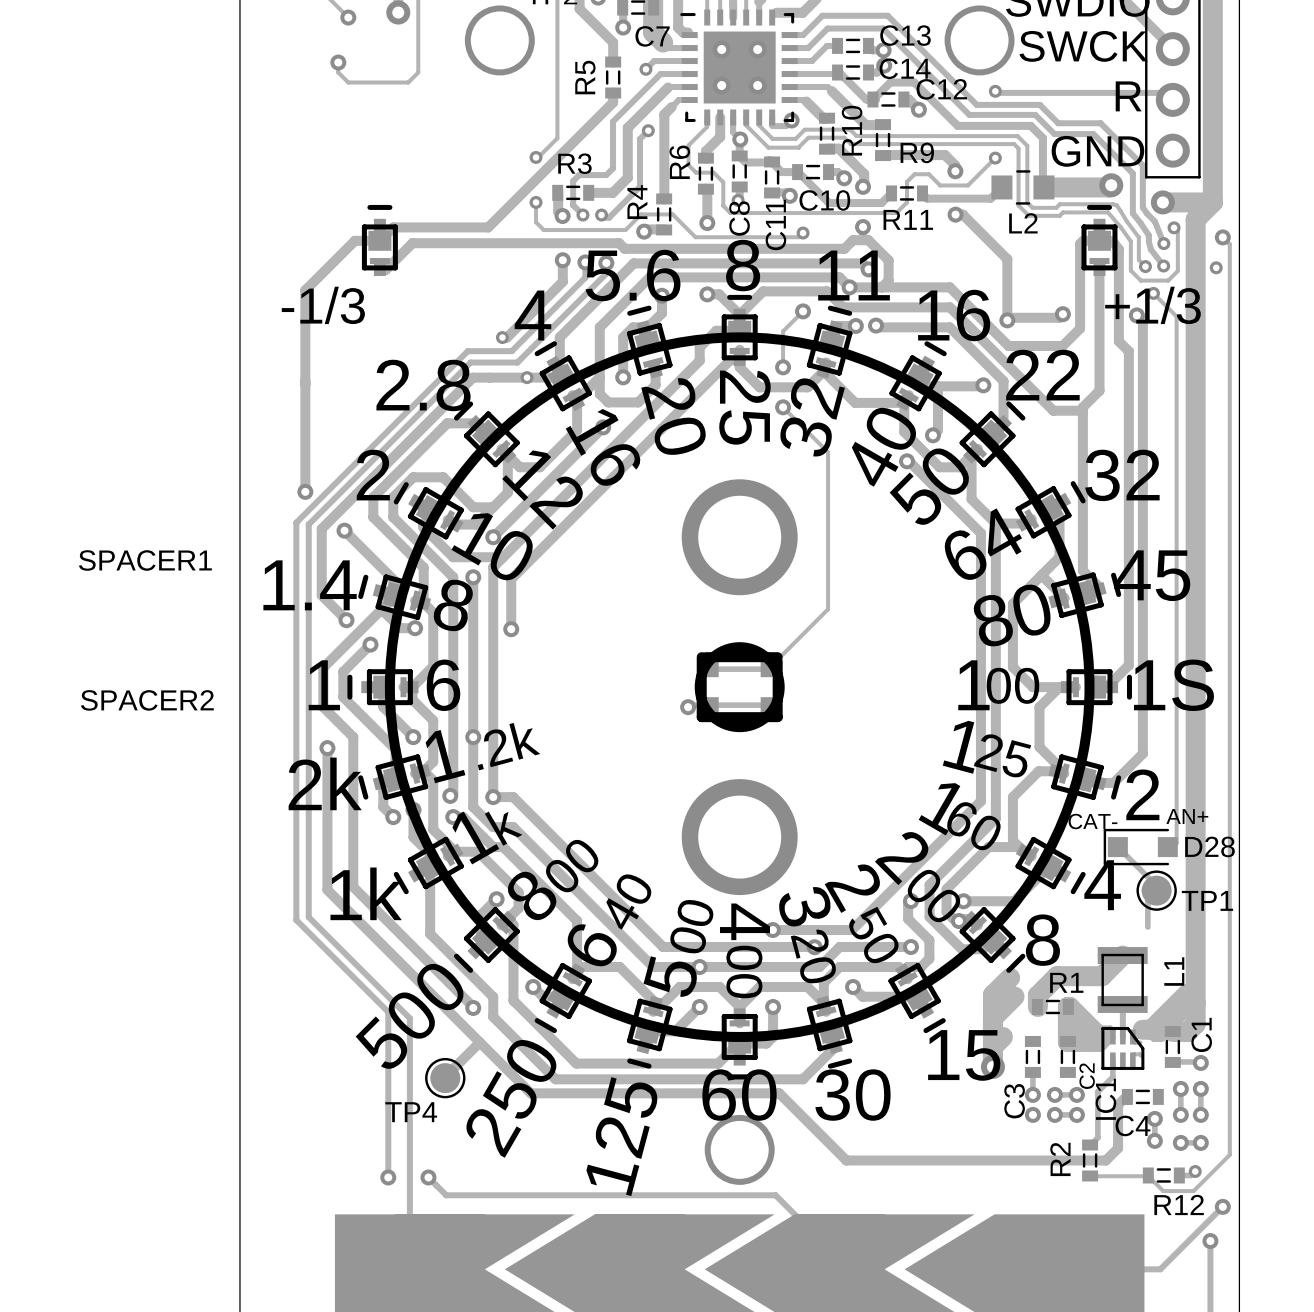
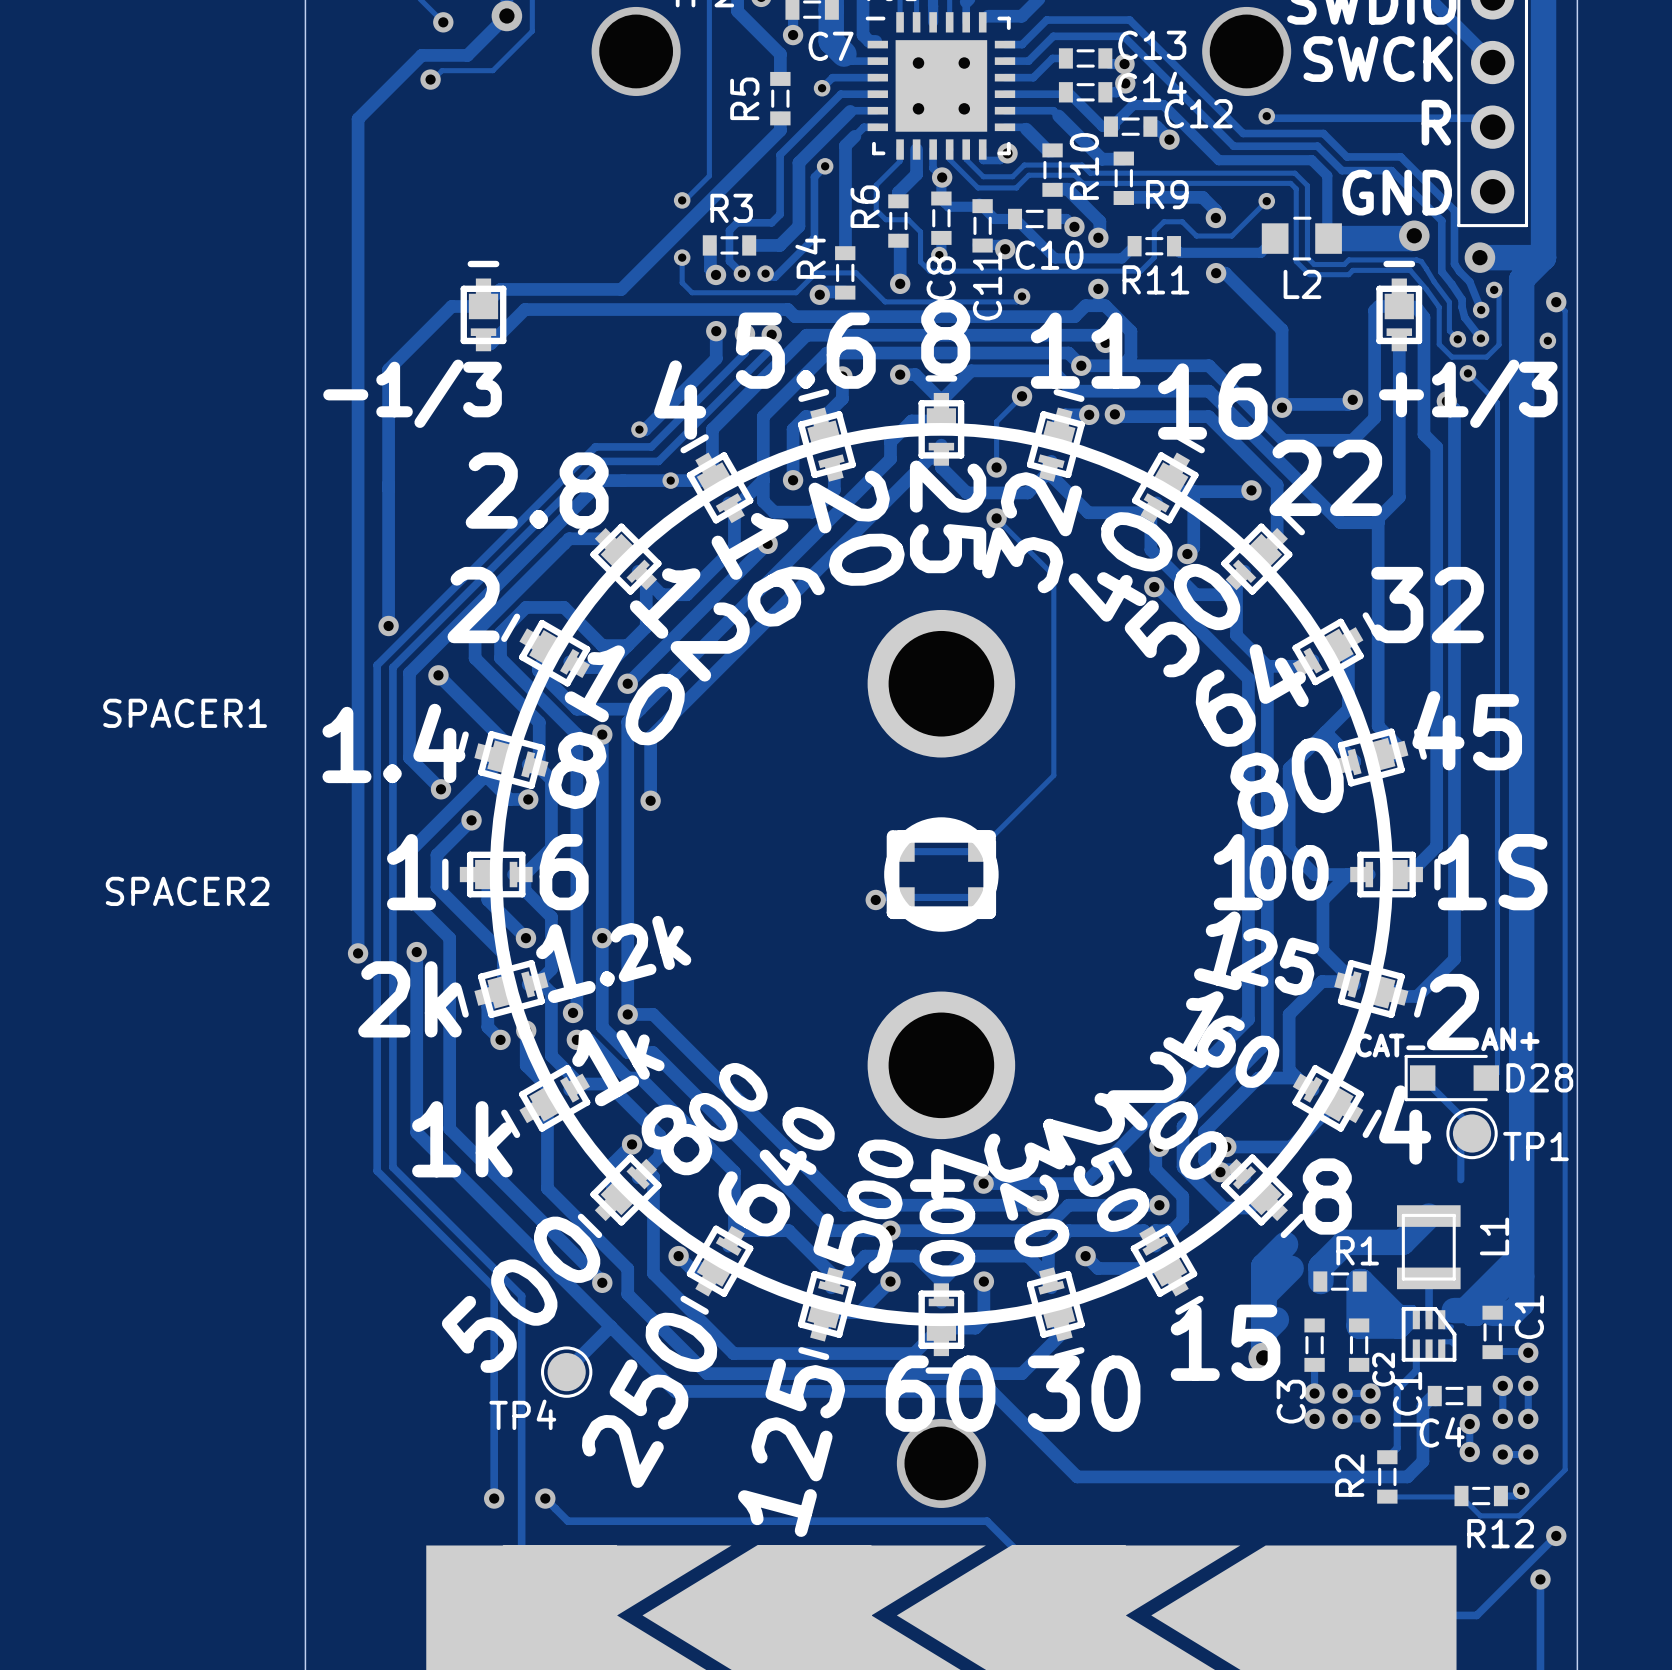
track: none -> (506, 15) (467, 55) (421, 55) (358, 119) (358, 953)
track: (418, 24) (418, 72) (408, 82) (348, 82) (338, 72) (338, 62) -> (532, 31) (492, 70) (442, 70) (431, 80)
via: none -> (358, 953)

